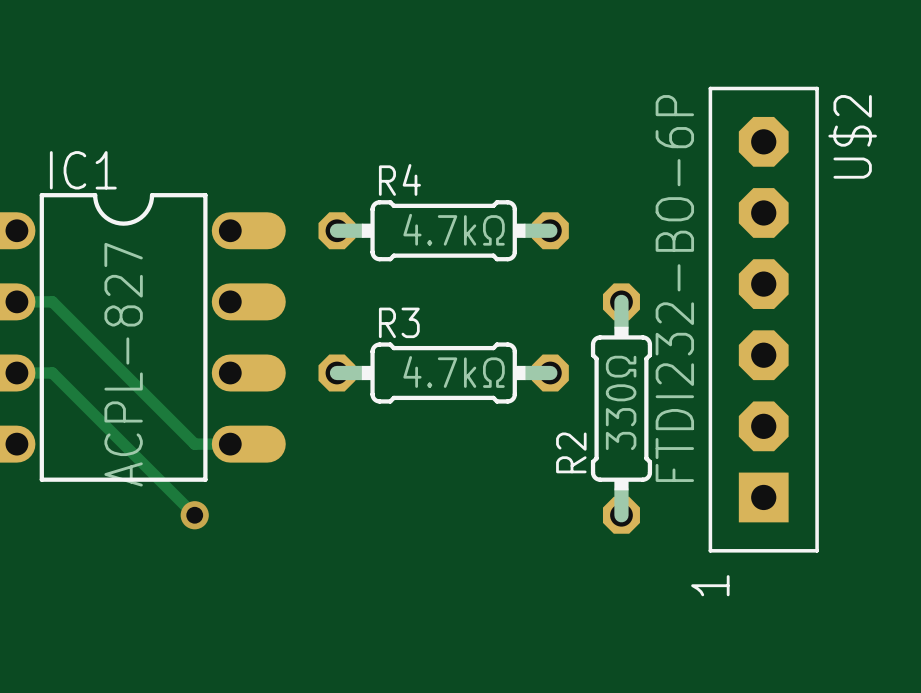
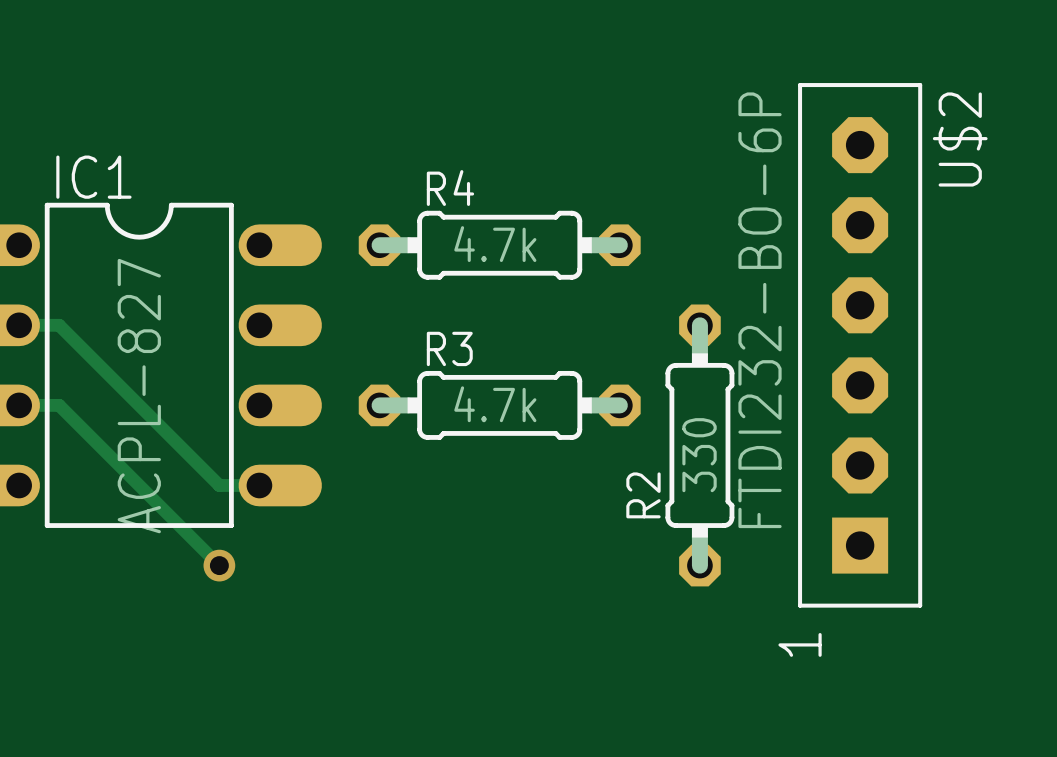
R4 value: 4.7kΩ (454, 229) -> 4.7k (495, 244)
R3 value: 4.7kΩ (454, 371) -> 4.7k (495, 404)
R2 value: 330Ω (621, 402) -> 330 (699, 455)

